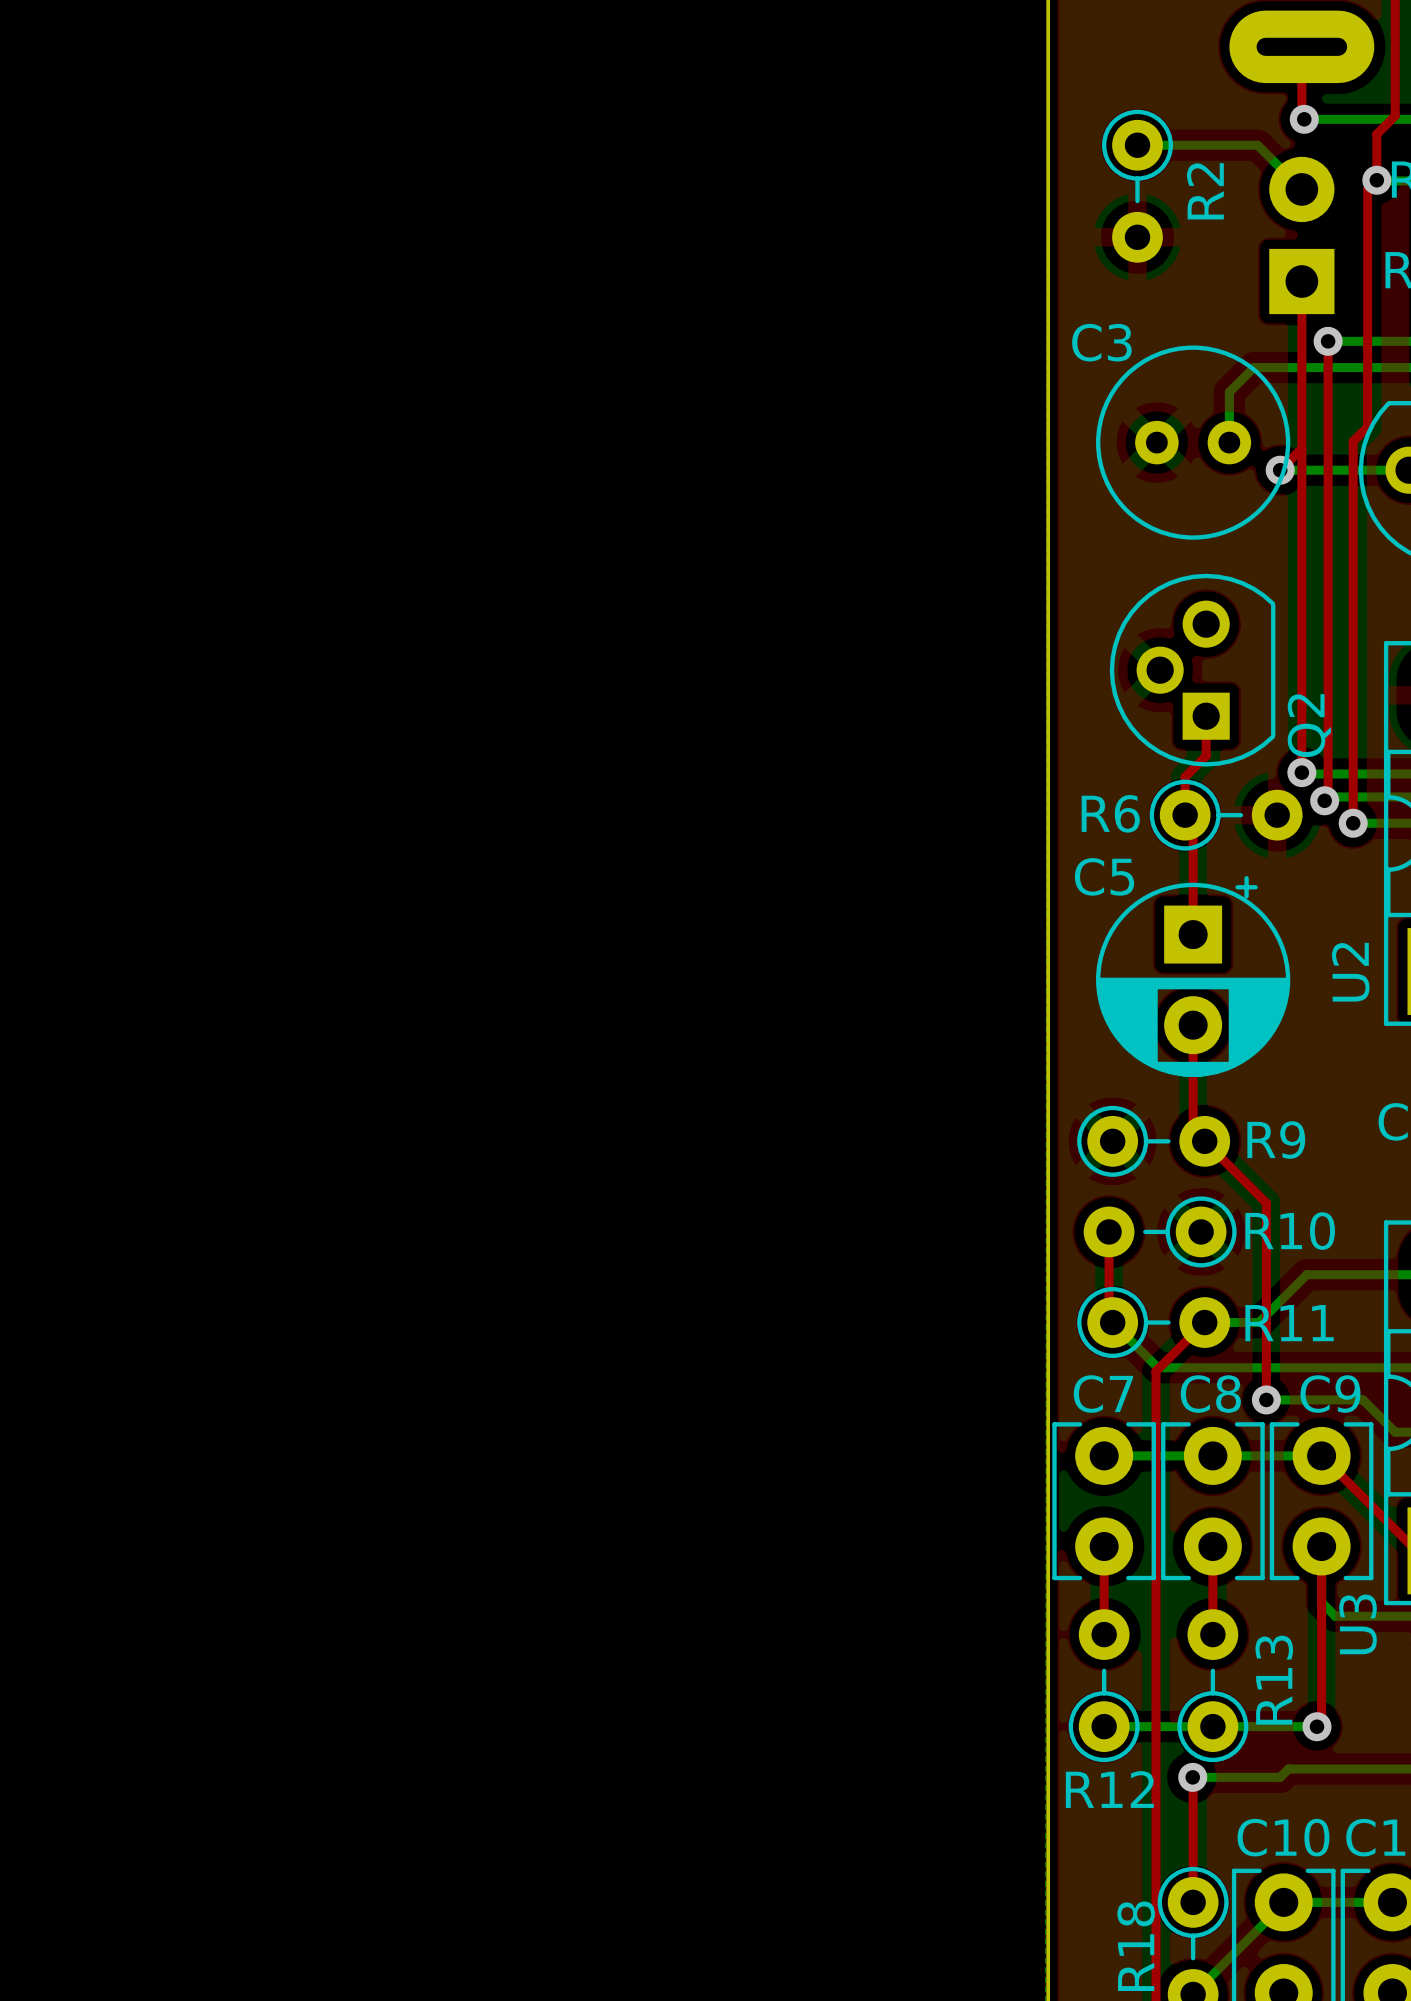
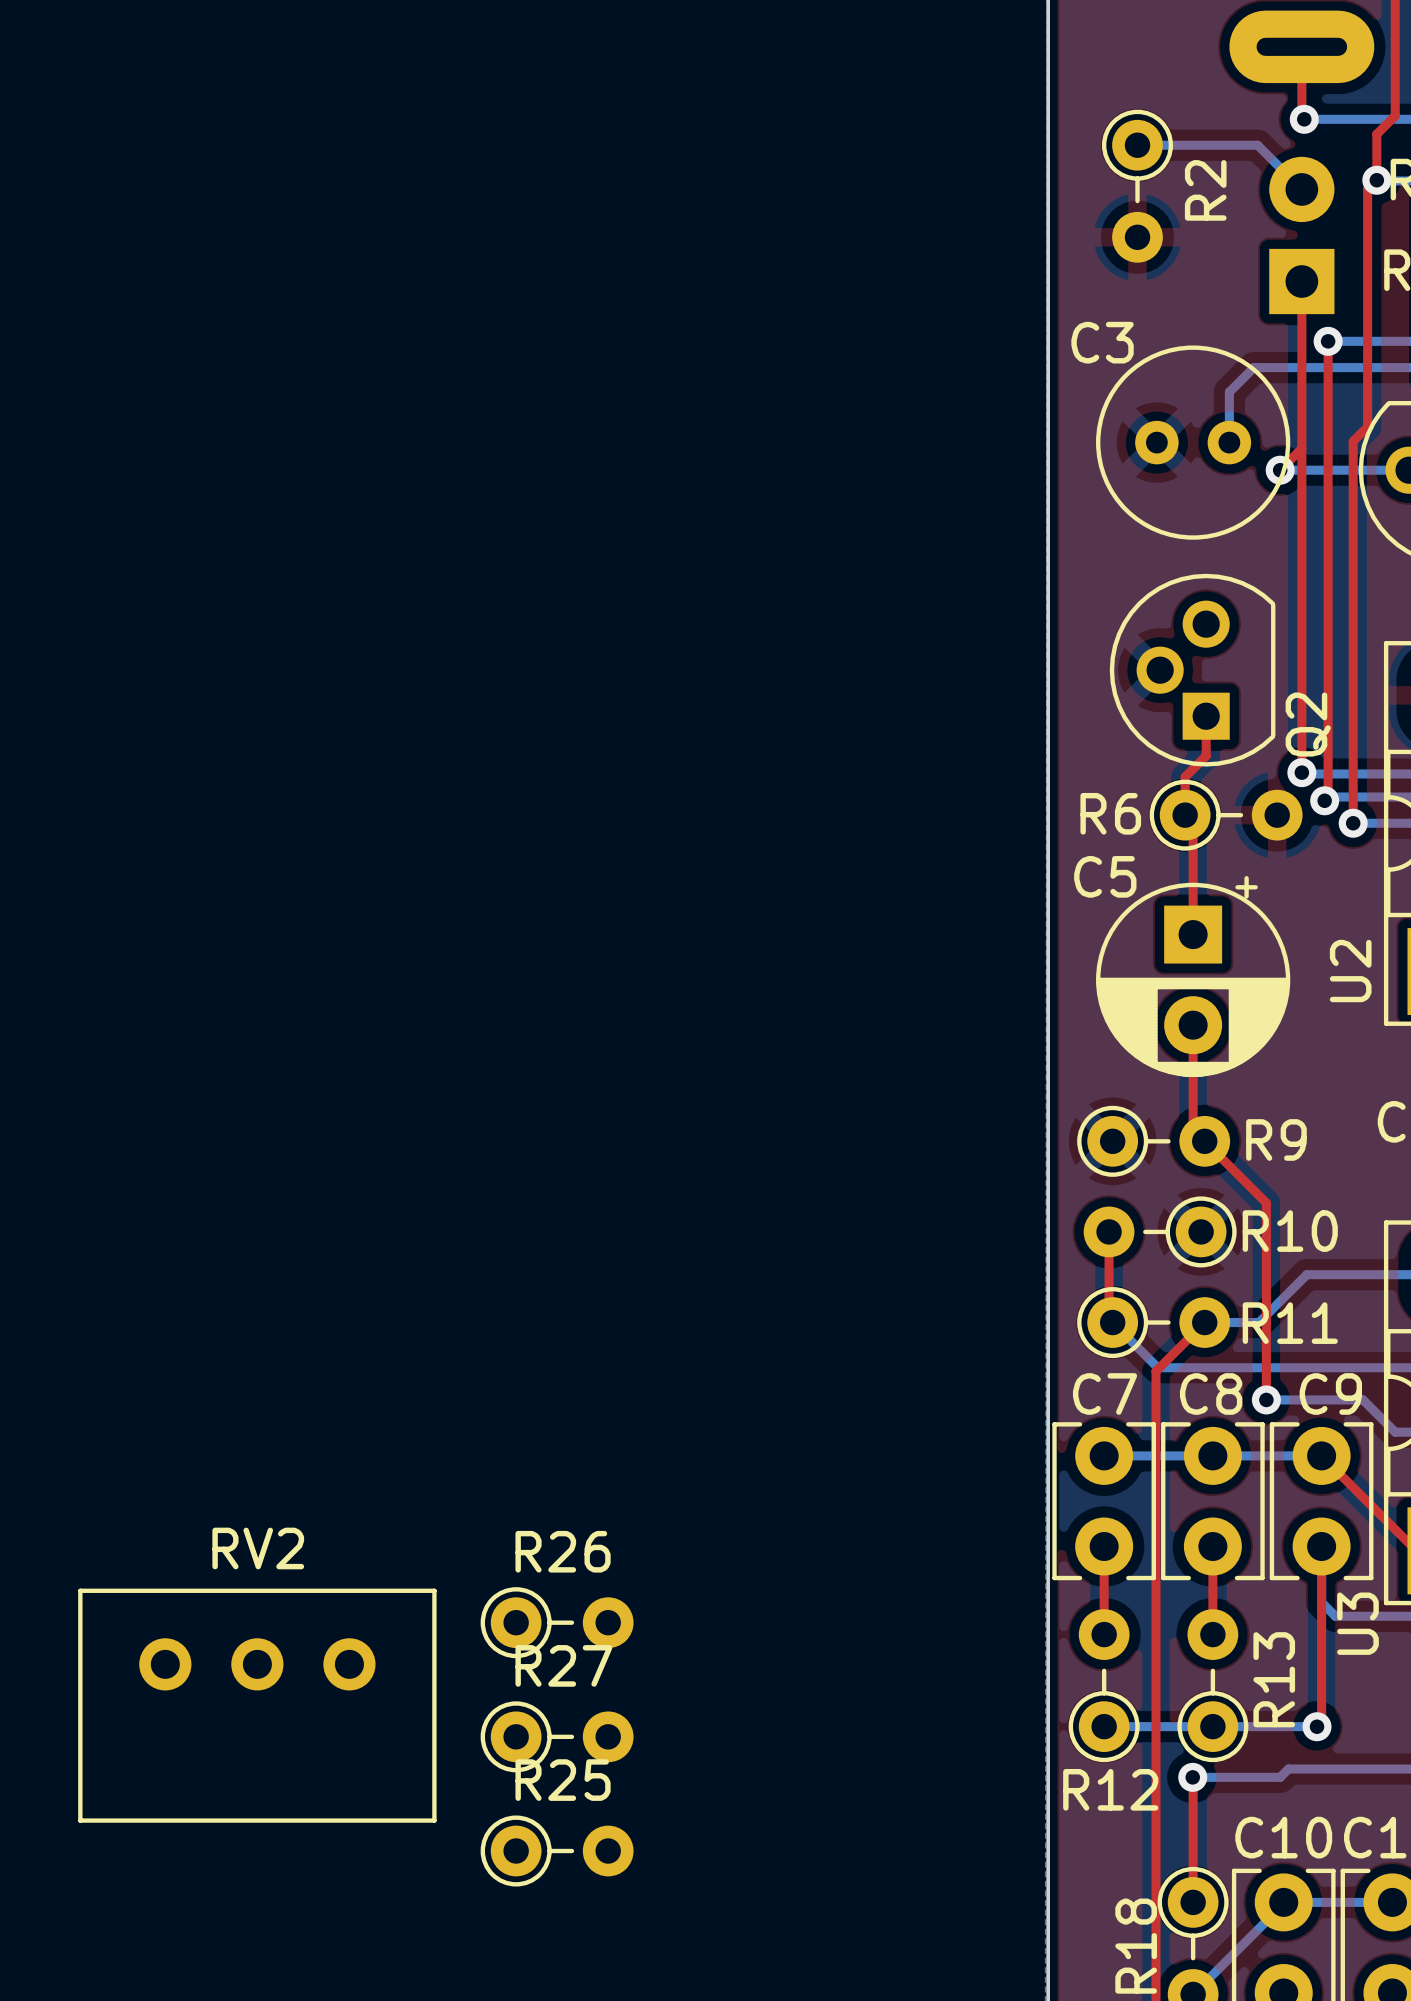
R26: none -> (557, 1622)
RV2: none -> (257, 1705)
R27: none -> (557, 1736)
R25: none -> (557, 1851)

